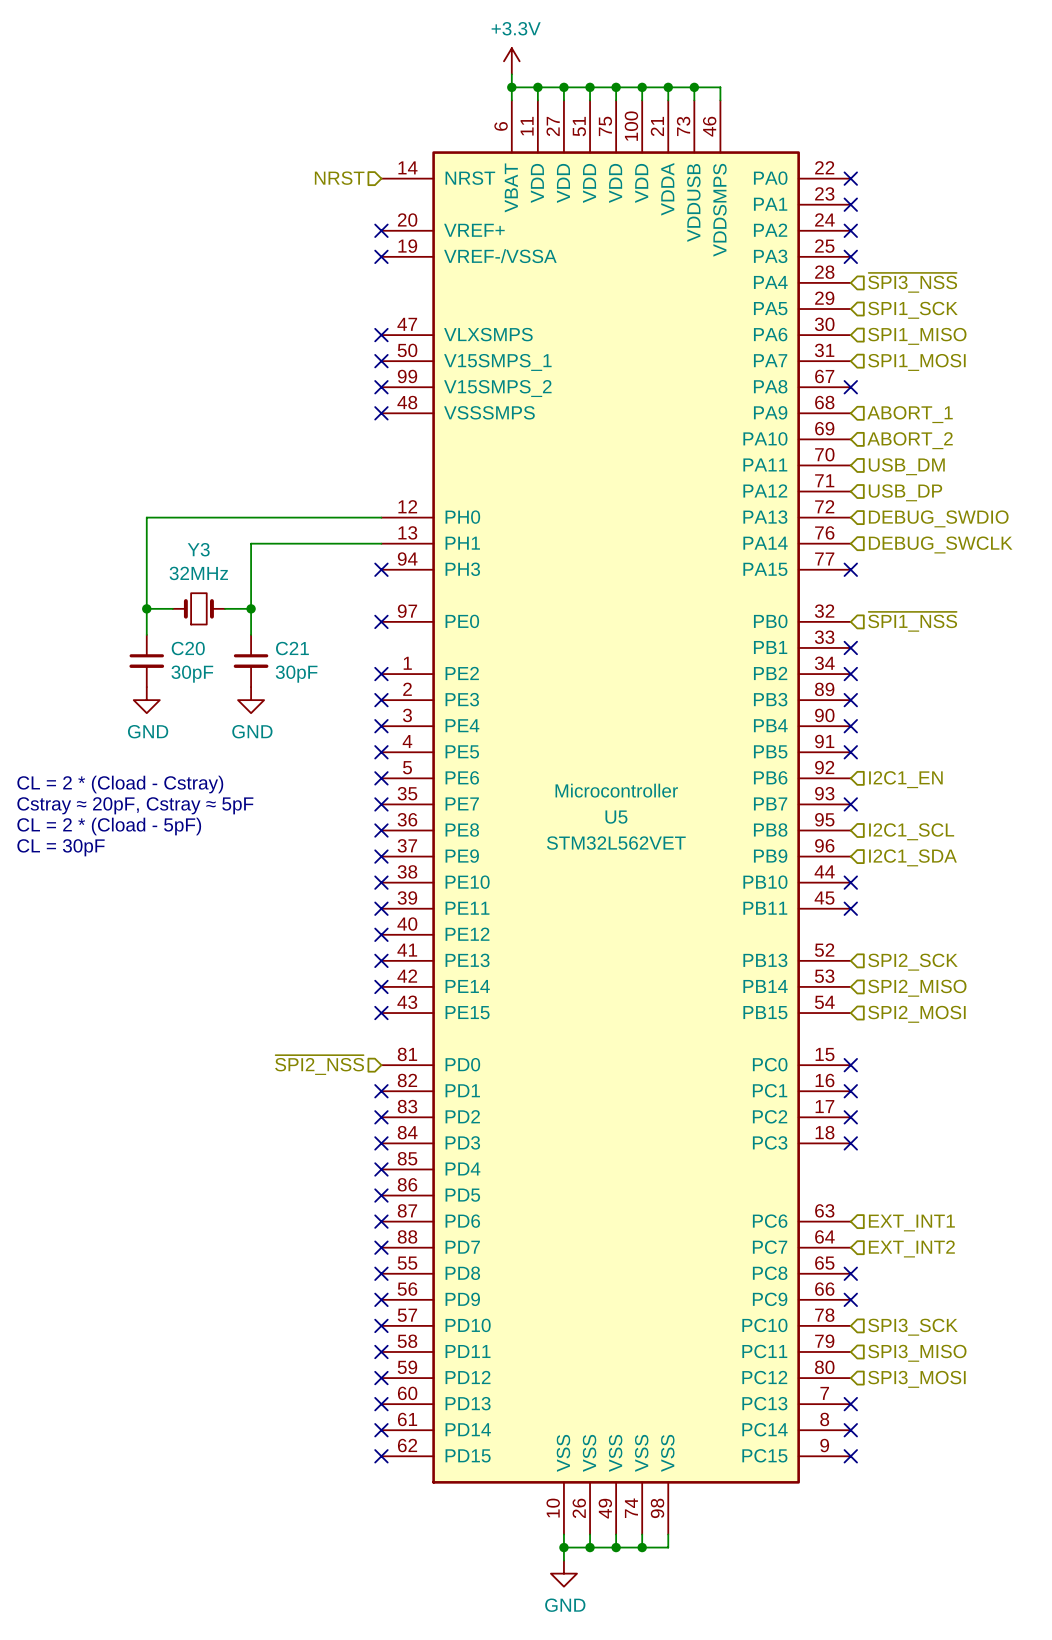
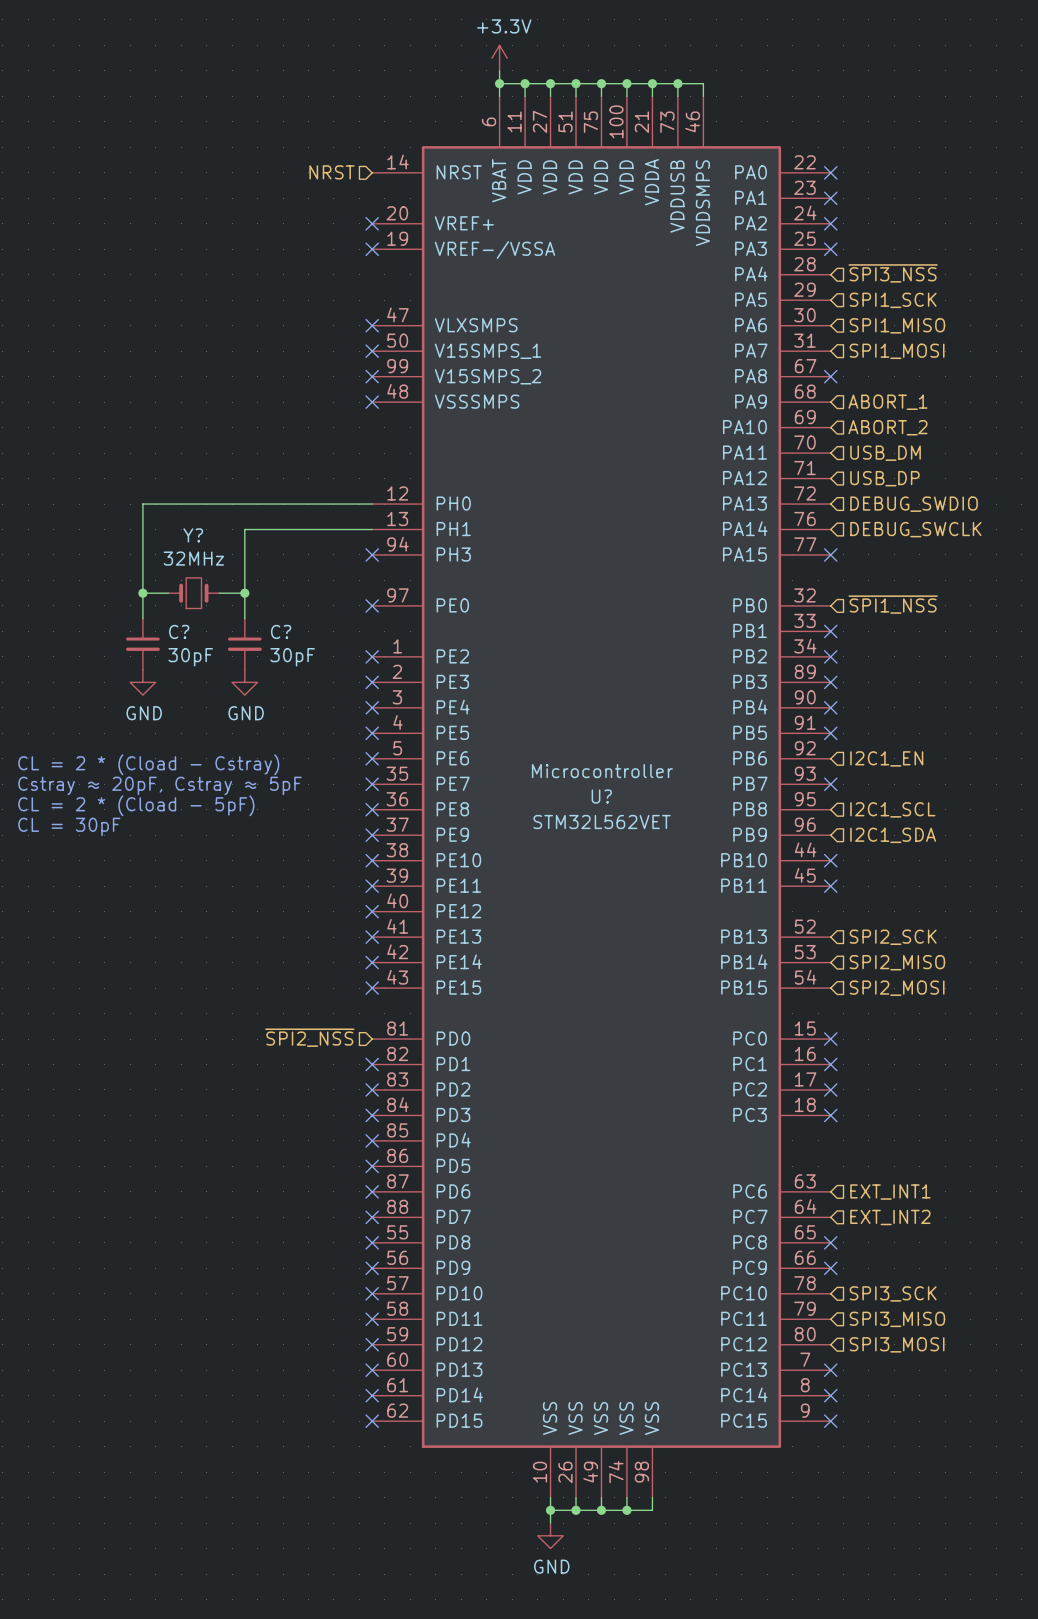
Y3 name: Y3 (198, 549) -> Y? (193, 535)
C20 name: C20 (188, 648) -> C? (179, 631)
C21 name: C21 (292, 648) -> C? (281, 631)
U5 name: U5 (616, 817) -> U? (601, 796)

